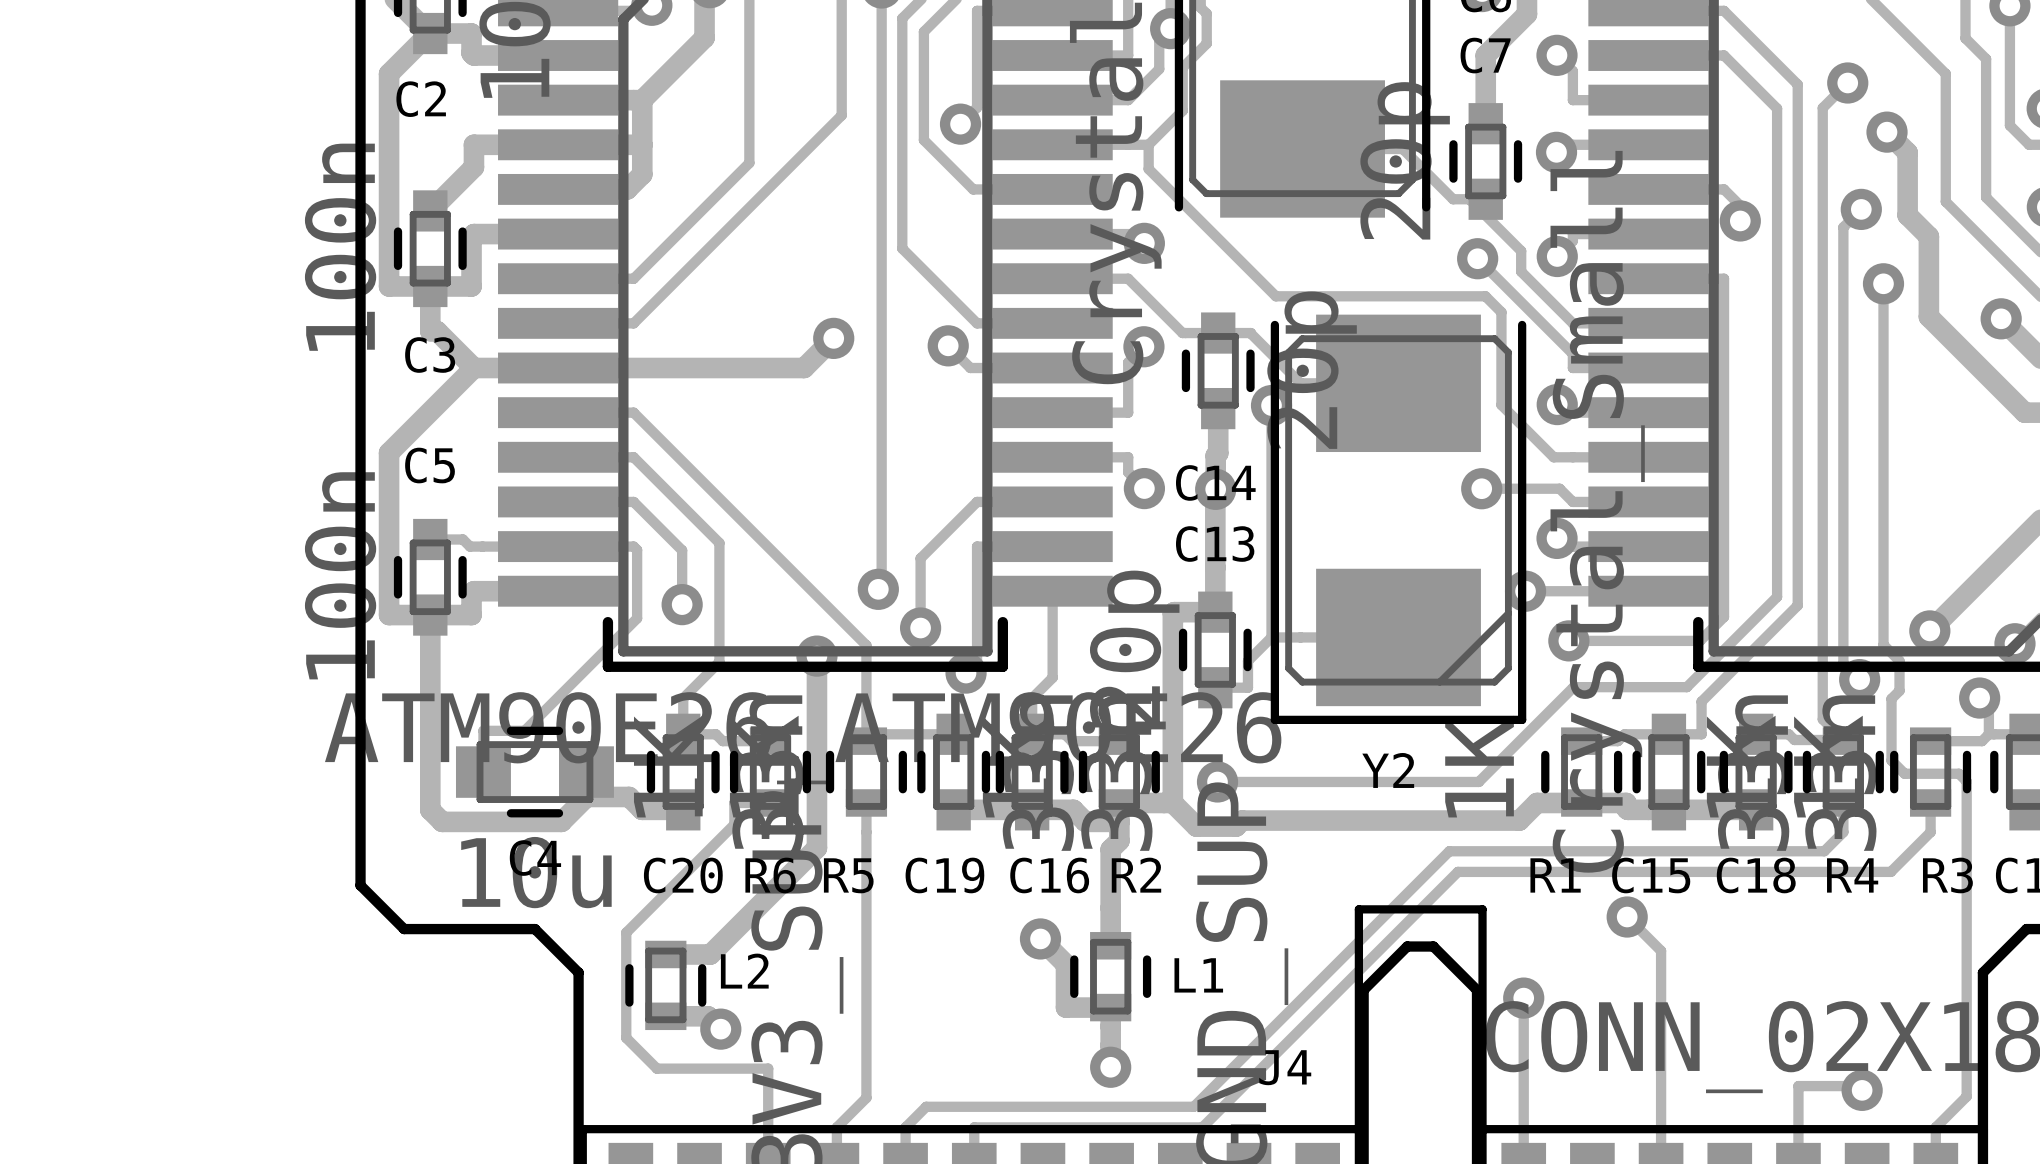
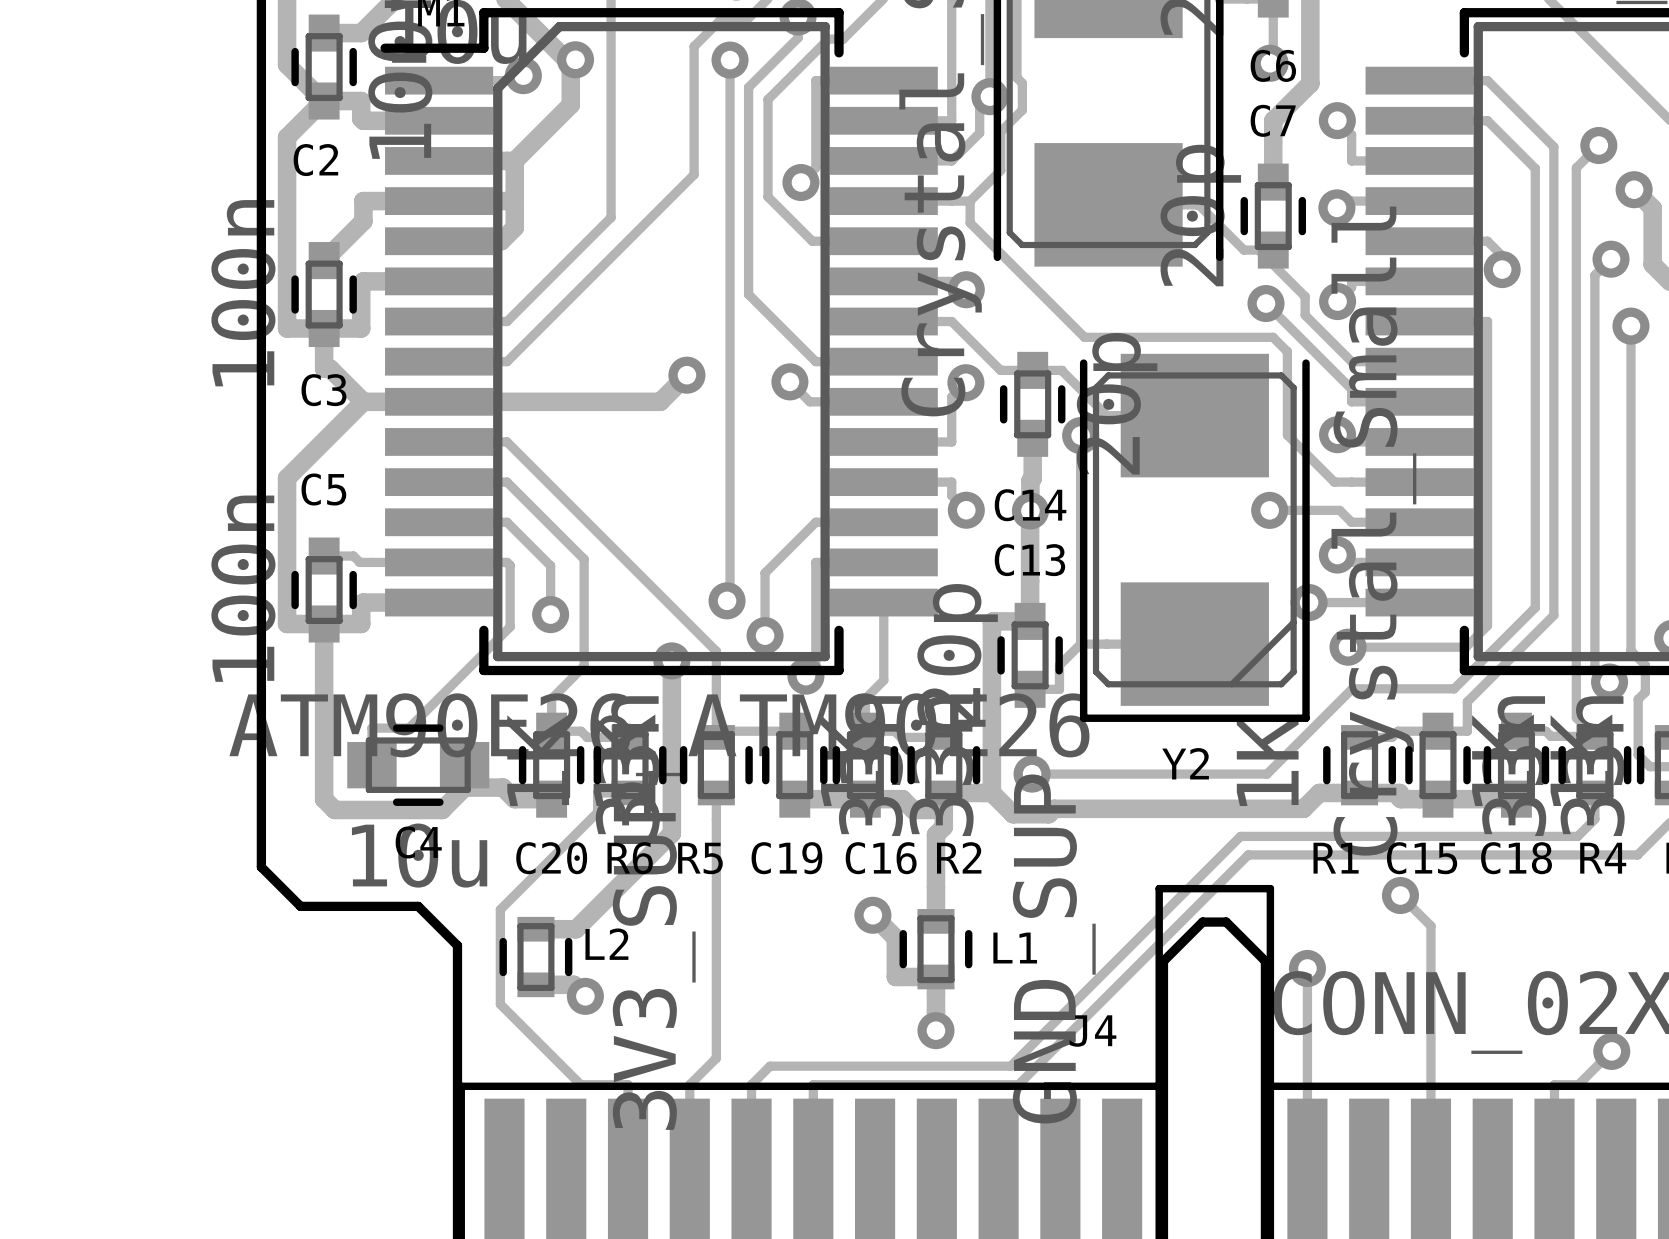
track: (656, 1068) (768, 1068) (768, 1127) -> (527, 1031) (580, 1084) (628, 1084)
track: (1862, 1090) (1857, 1086) (1798, 1086) (1798, 1127) -> (1611, 1051) (1578, 1084) (1554, 1084)

